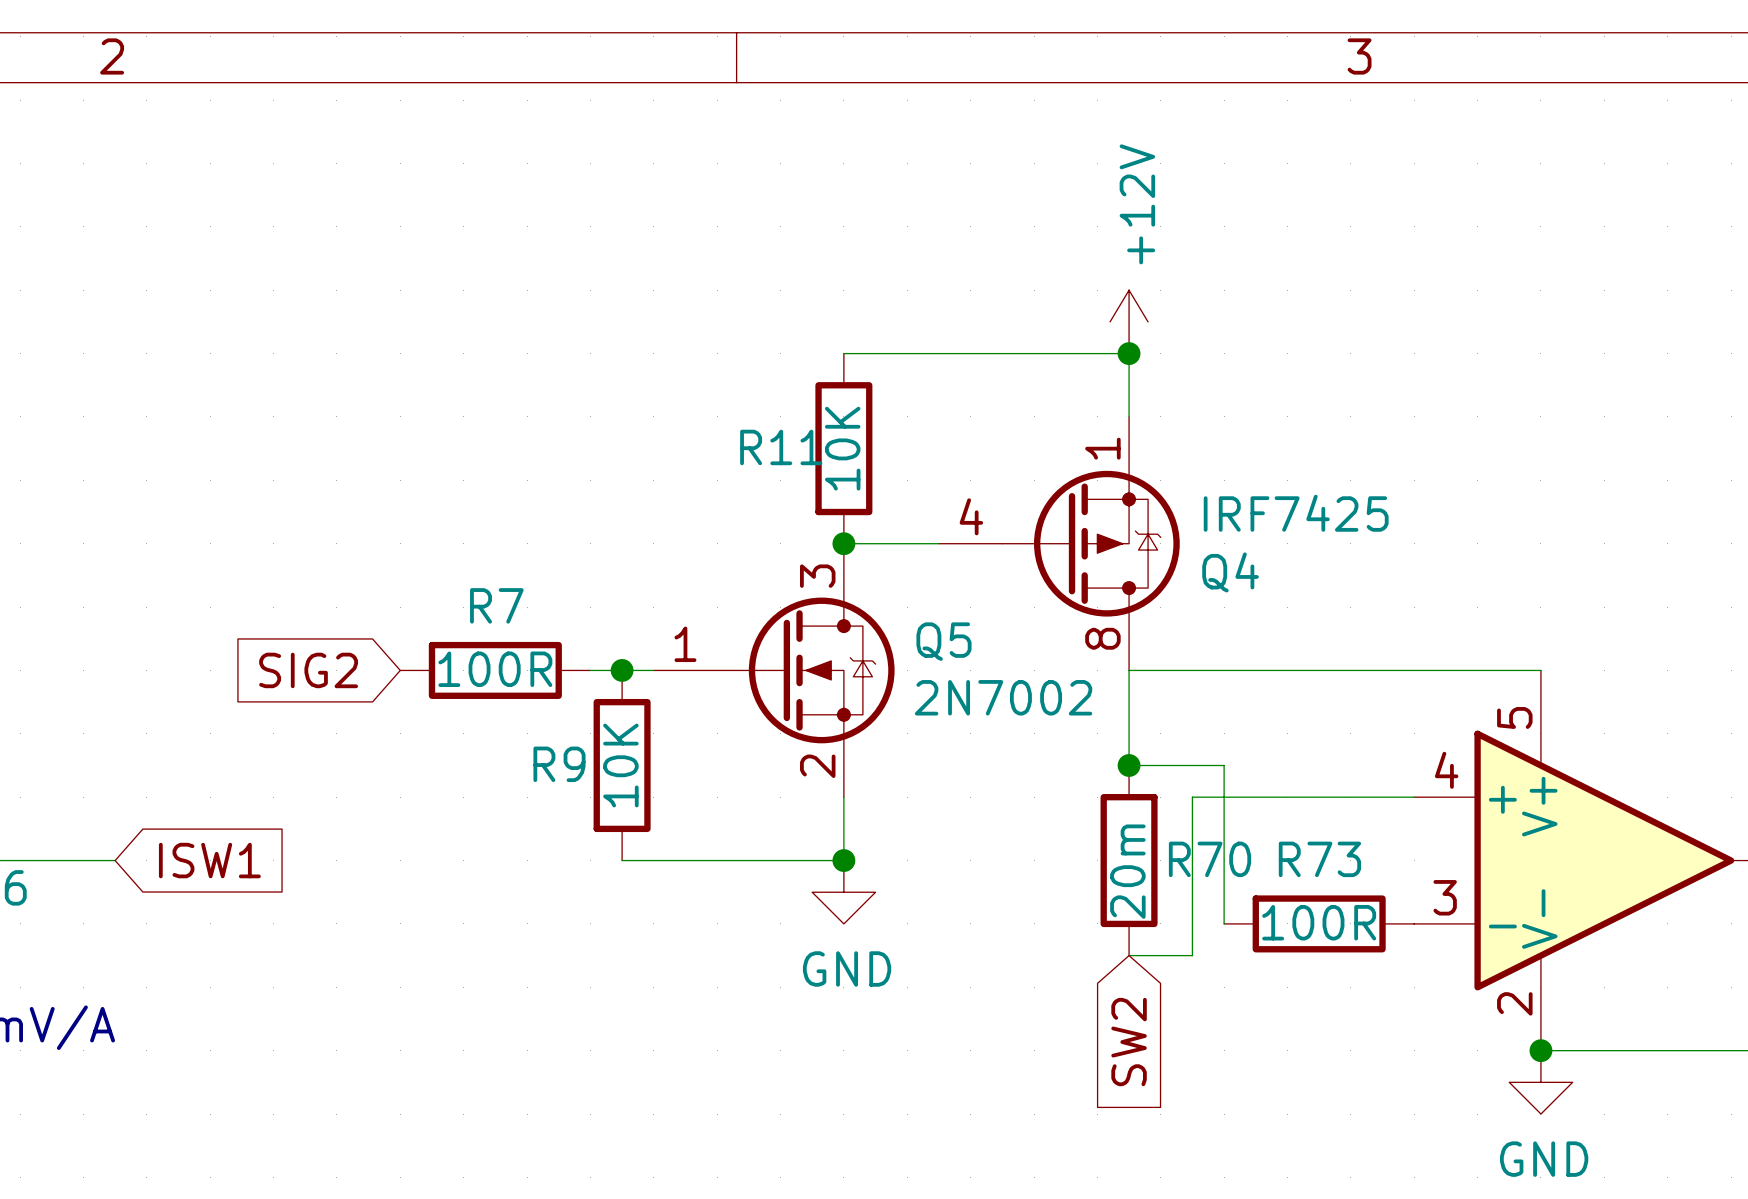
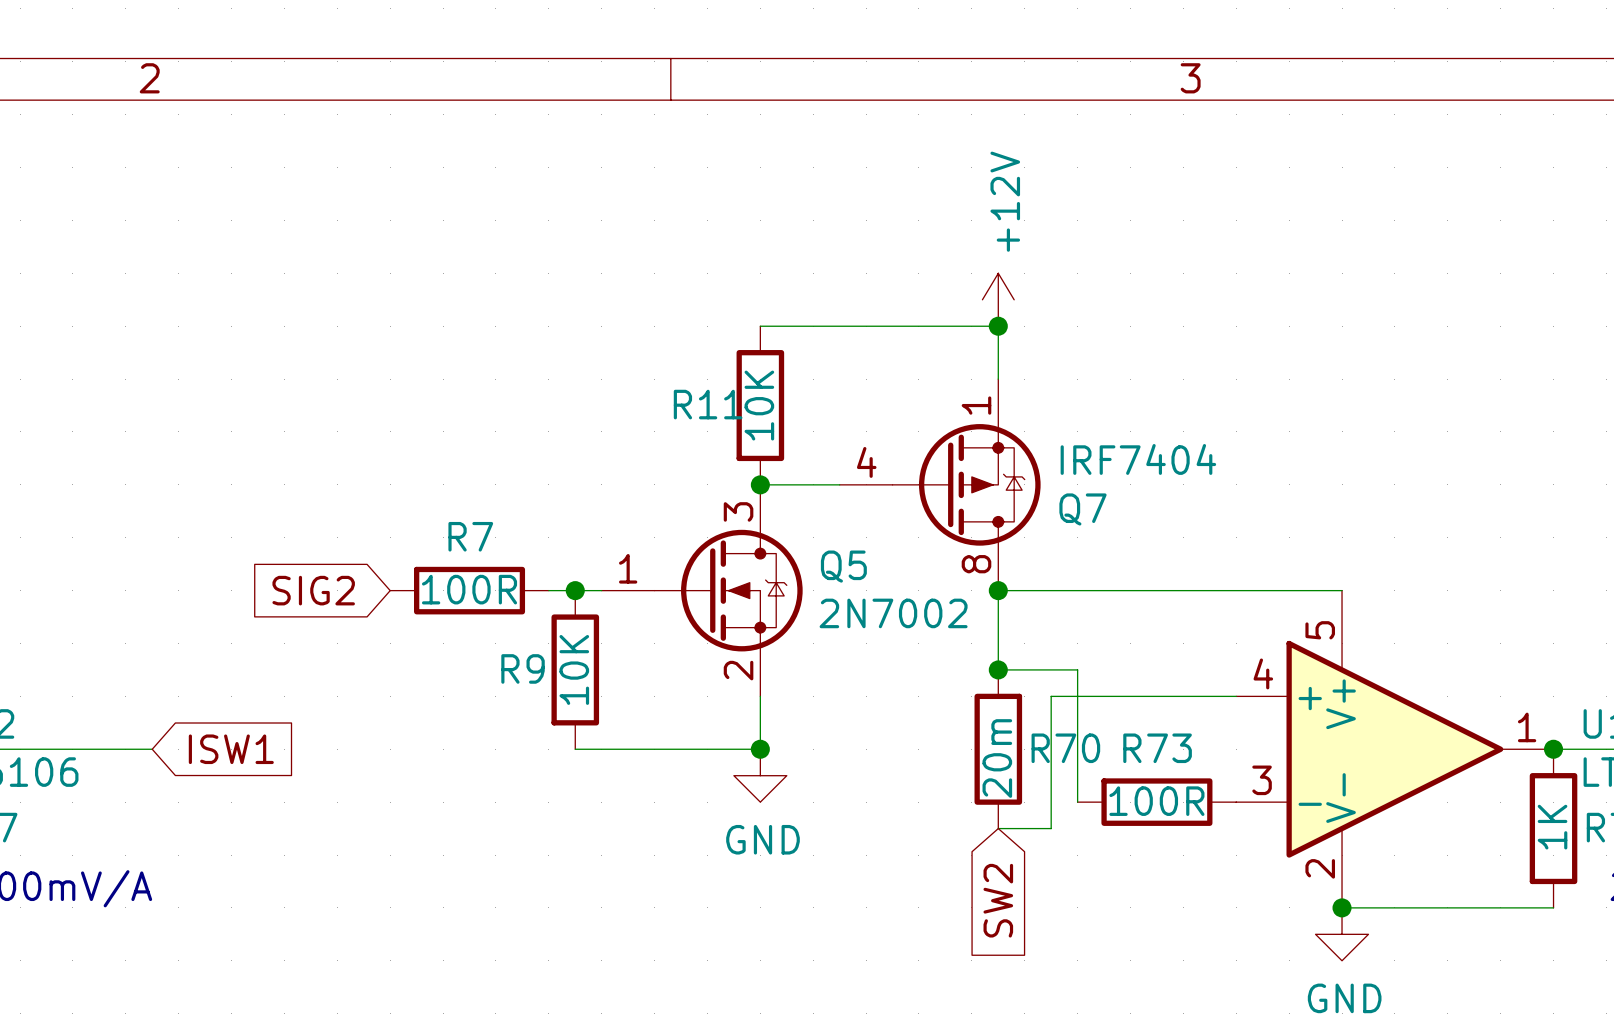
Q4 value: IRF7425 (1296, 513) -> IRF7404 (1138, 459)
Q4 name: Q4 (1230, 572) -> Q7 (1082, 509)
junction: none -> (998, 590)

